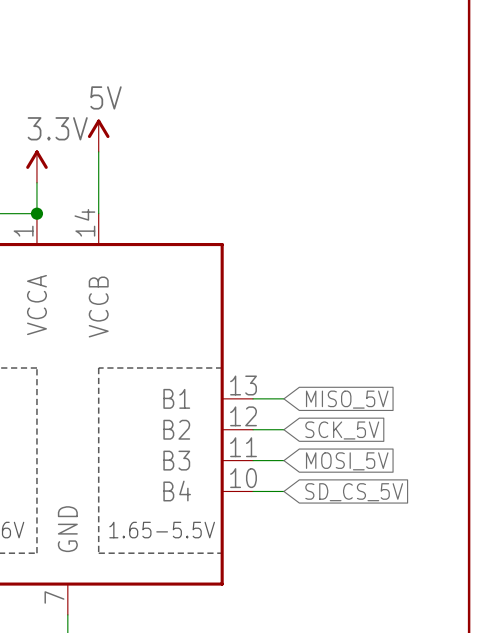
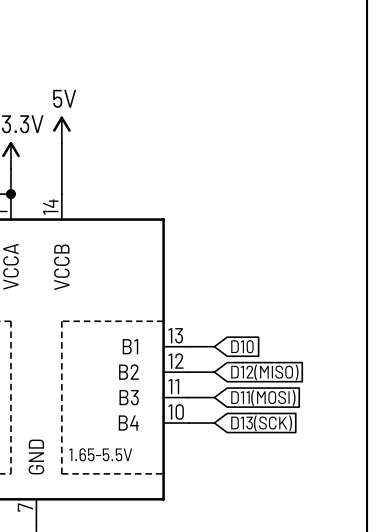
global label: MISO_5V (347, 399) -> D10 (242, 346)
global label: SCK_5V (342, 430) -> D12(MISO) (264, 372)
global label: MOSI_5V (347, 461) -> D11(MOSI) (263, 397)
global label: SD_CS_5V (354, 492) -> D13(SCK) (261, 423)

